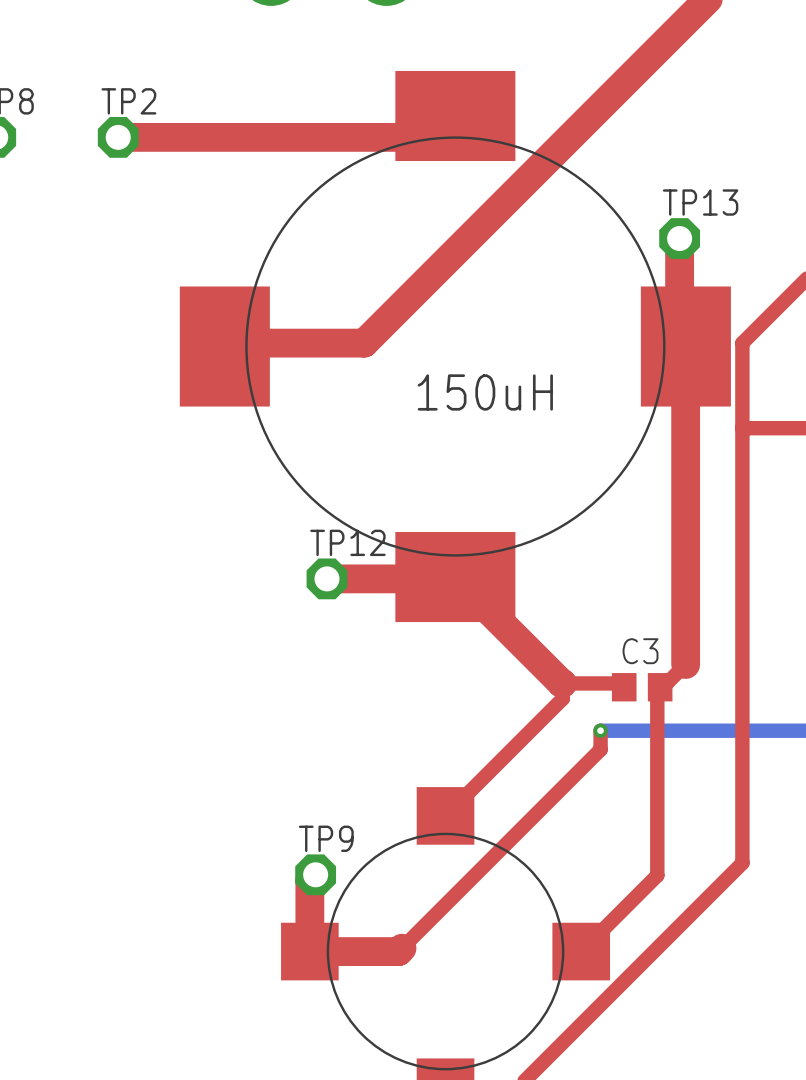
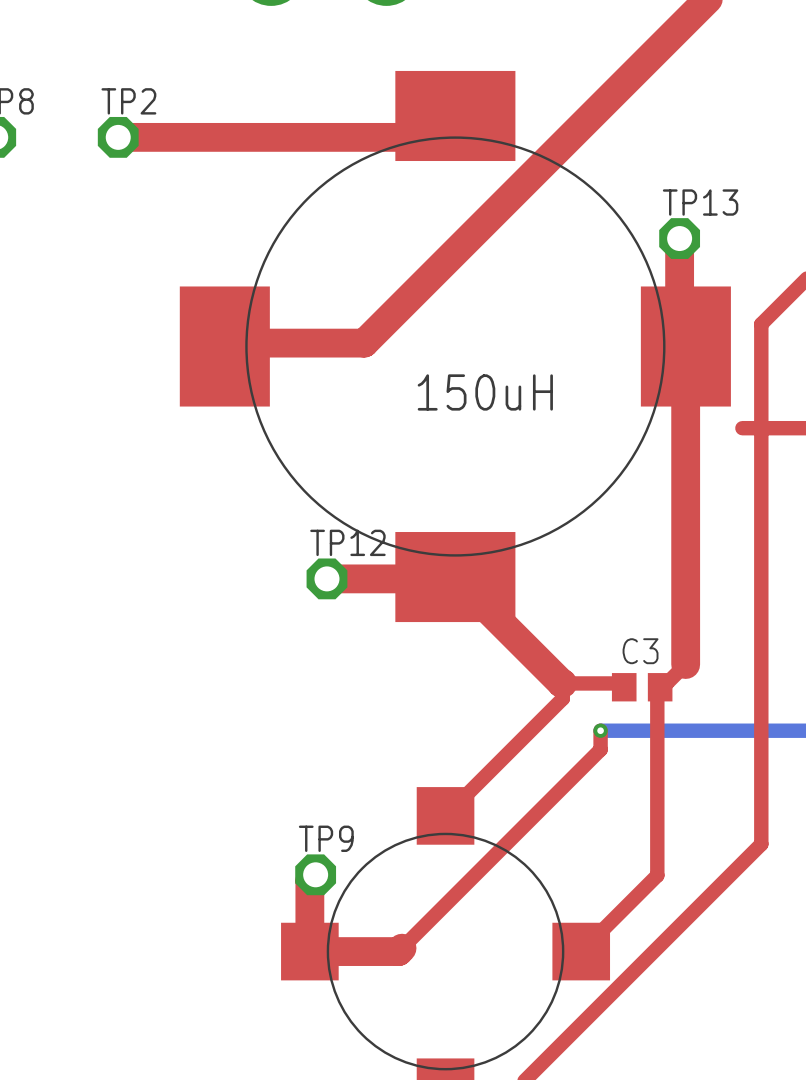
top track: (761, 324) (742, 343) (742, 863) -> (761, 324) (761, 844) (742, 863)

